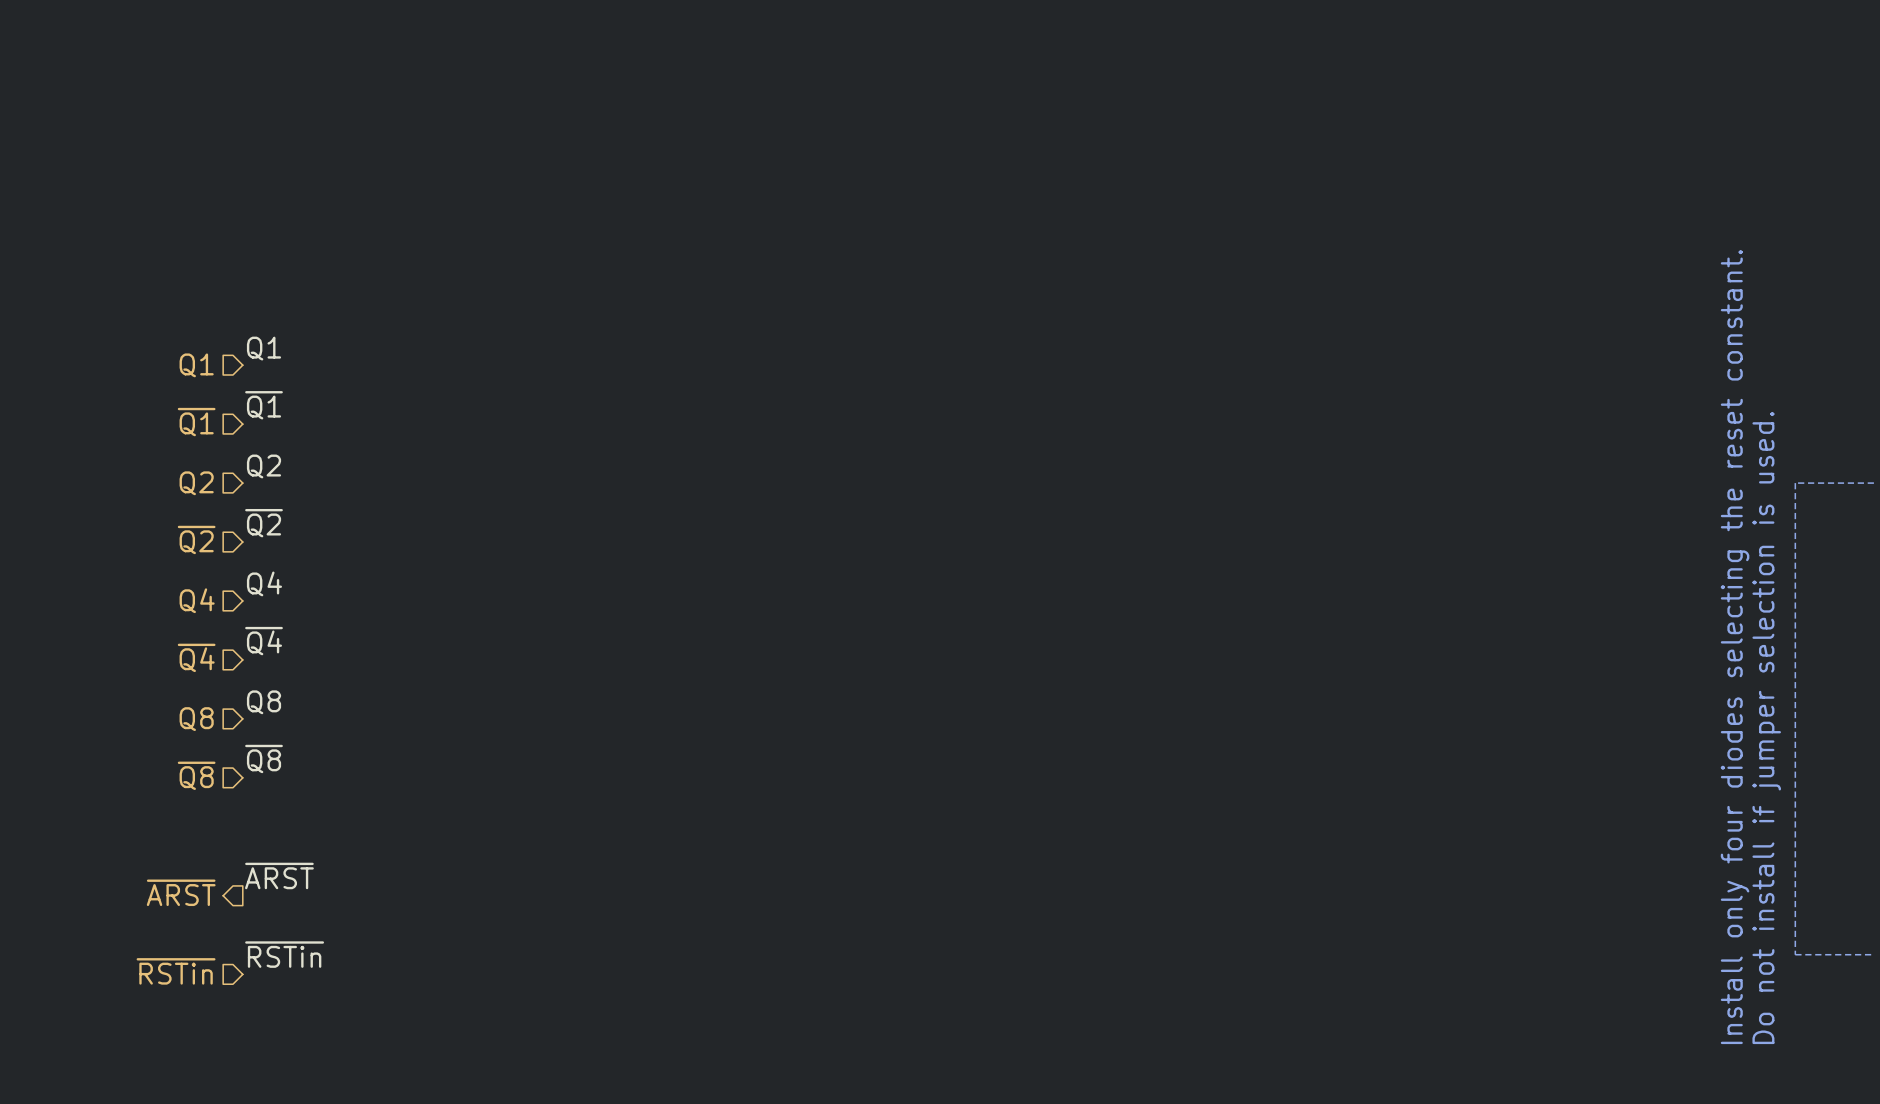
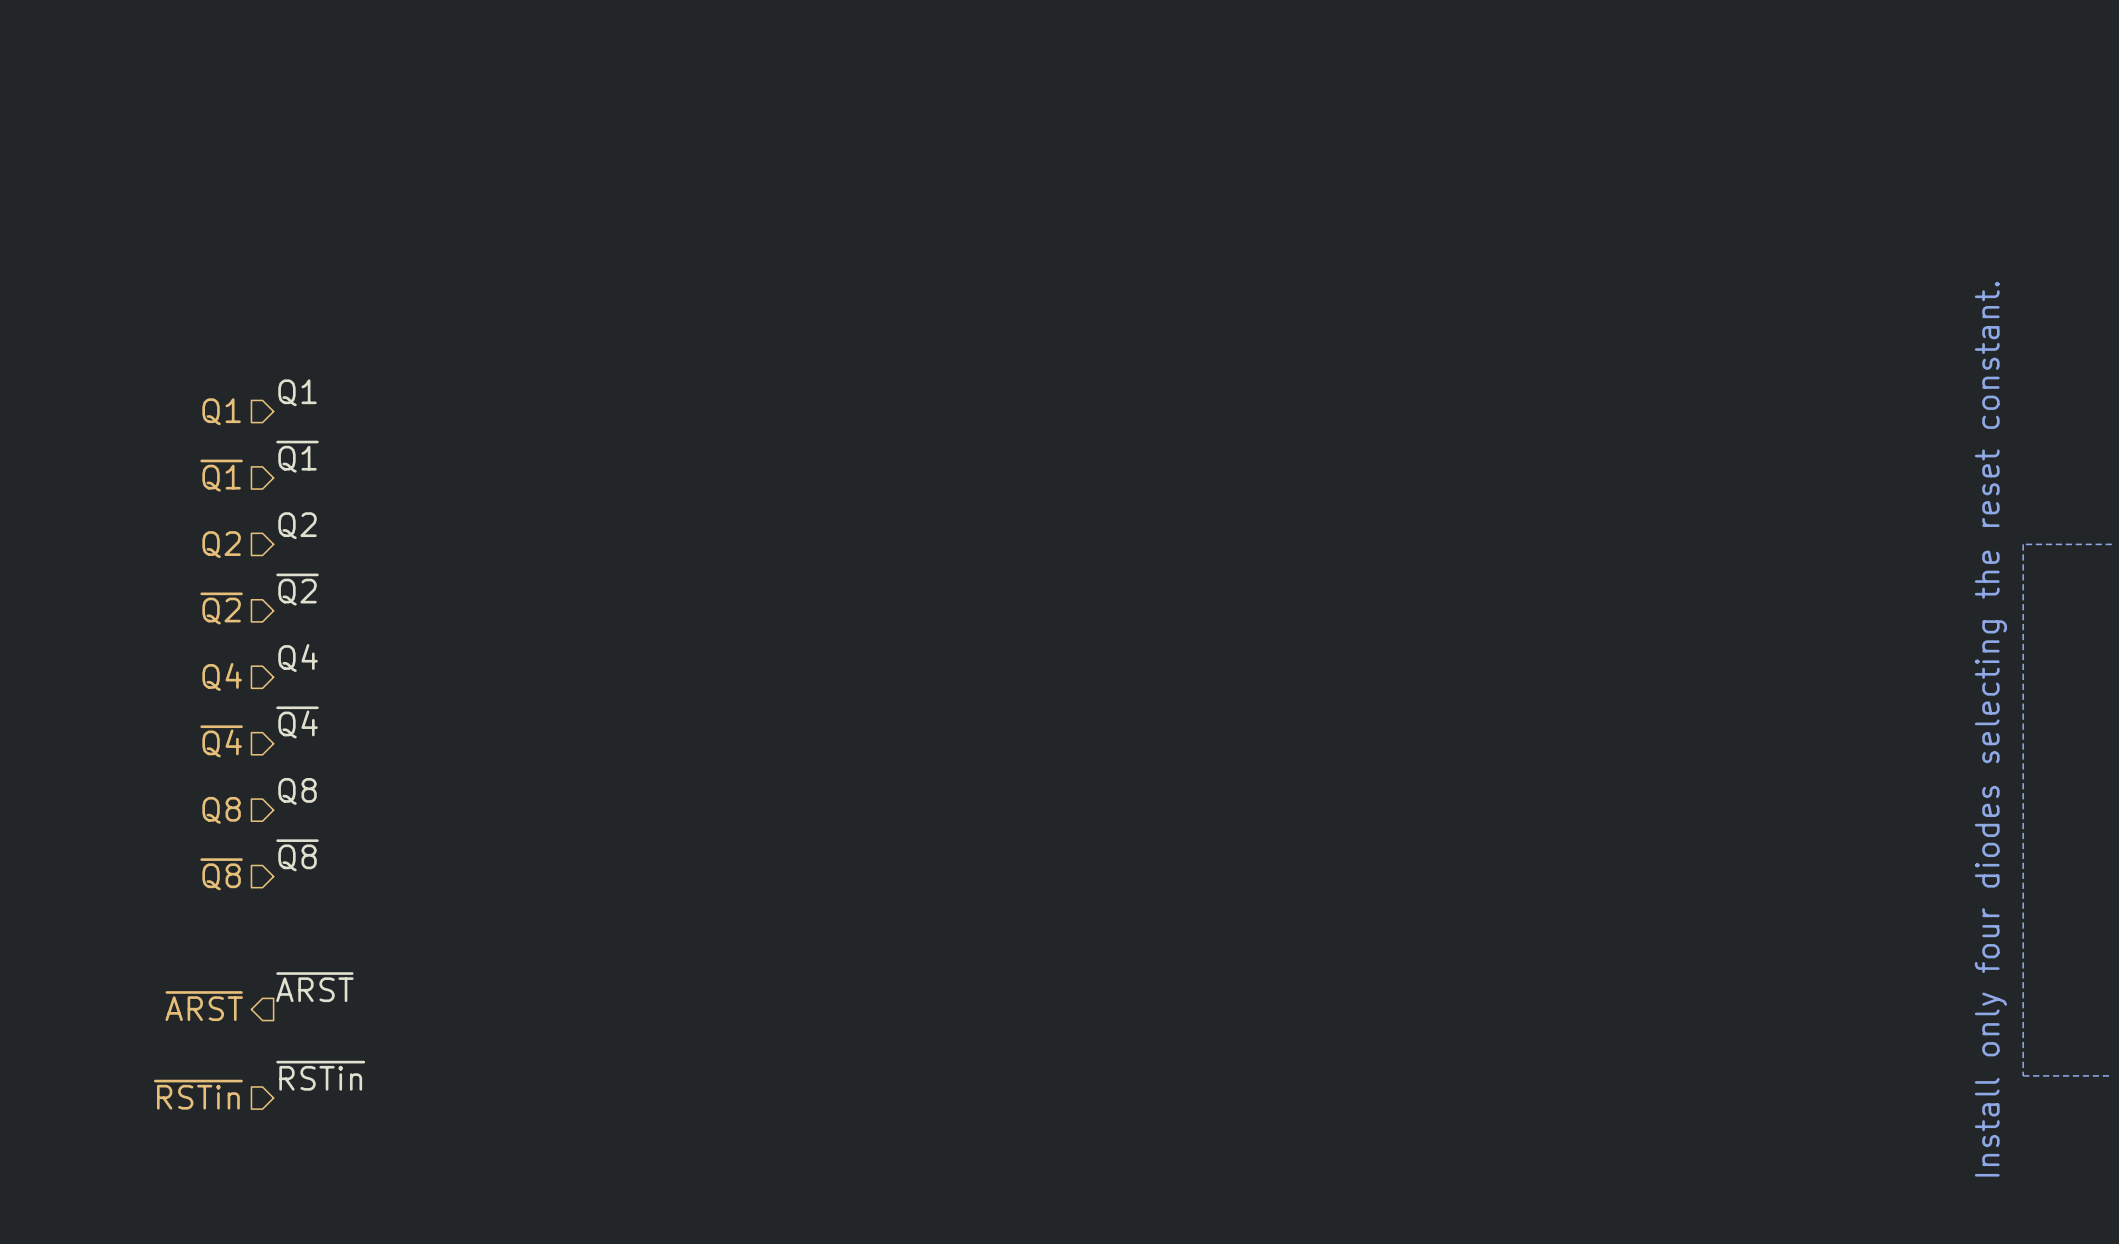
text: Install only four diodes selecting the reset constant. (1735, 647) -> none
text: Do not install if jumper selection is used. (1766, 727) -> Install only four diodes selecting the reset constant. (1990, 729)

